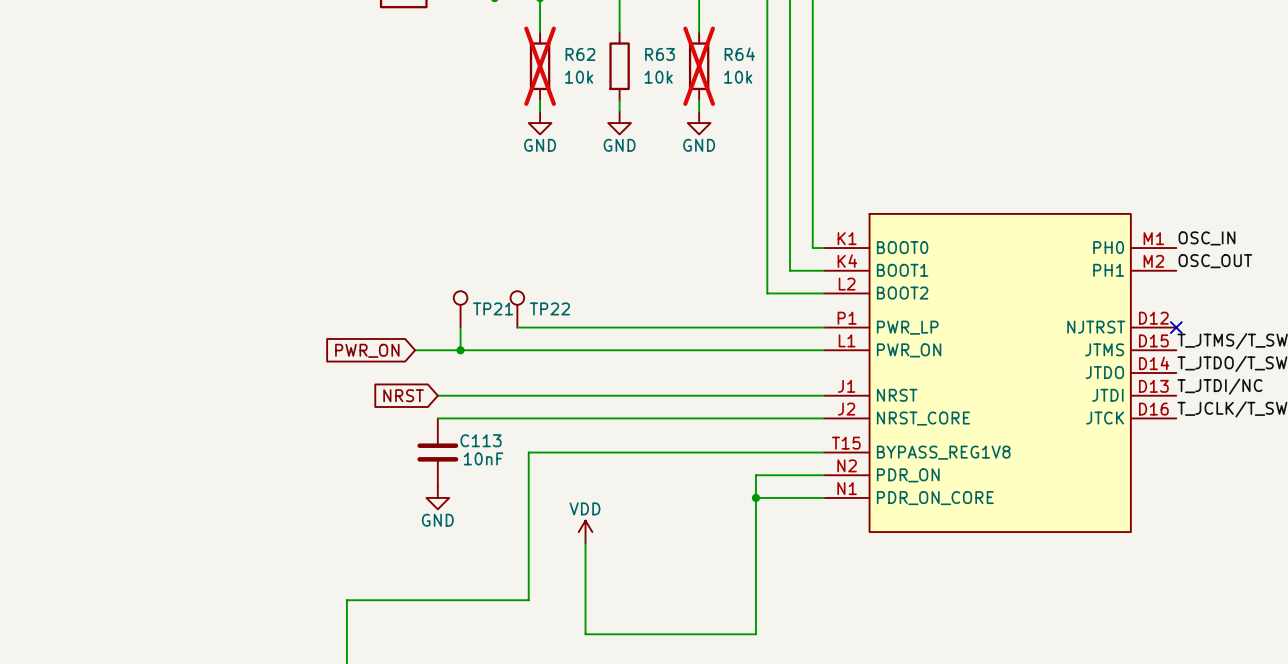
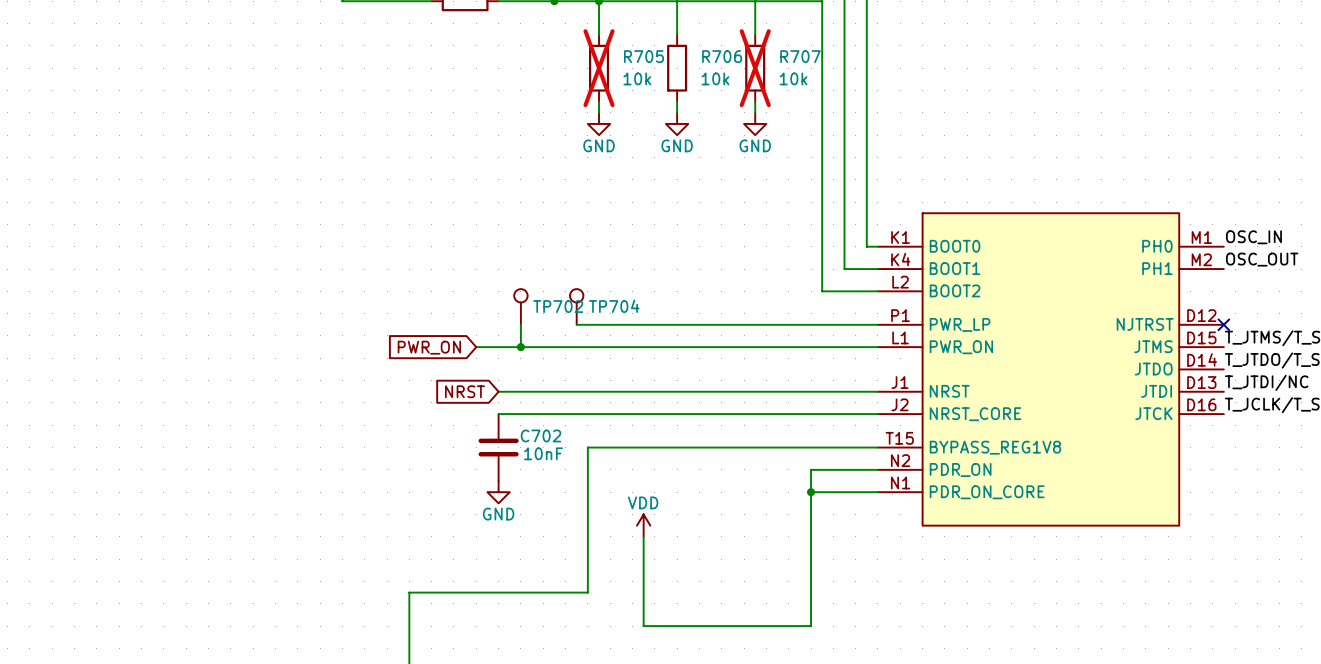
R62 name: R62 (580, 54) -> R705 (644, 56)
R63 name: R63 (660, 54) -> R706 (722, 56)
R64 name: R64 (739, 54) -> R707 (800, 56)
TP21 name: TP21 (493, 308) -> TP702 (558, 306)
TP22 name: TP22 (549, 308) -> TP704 (614, 306)
C113 name: C113 (481, 440) -> C702 (541, 435)

